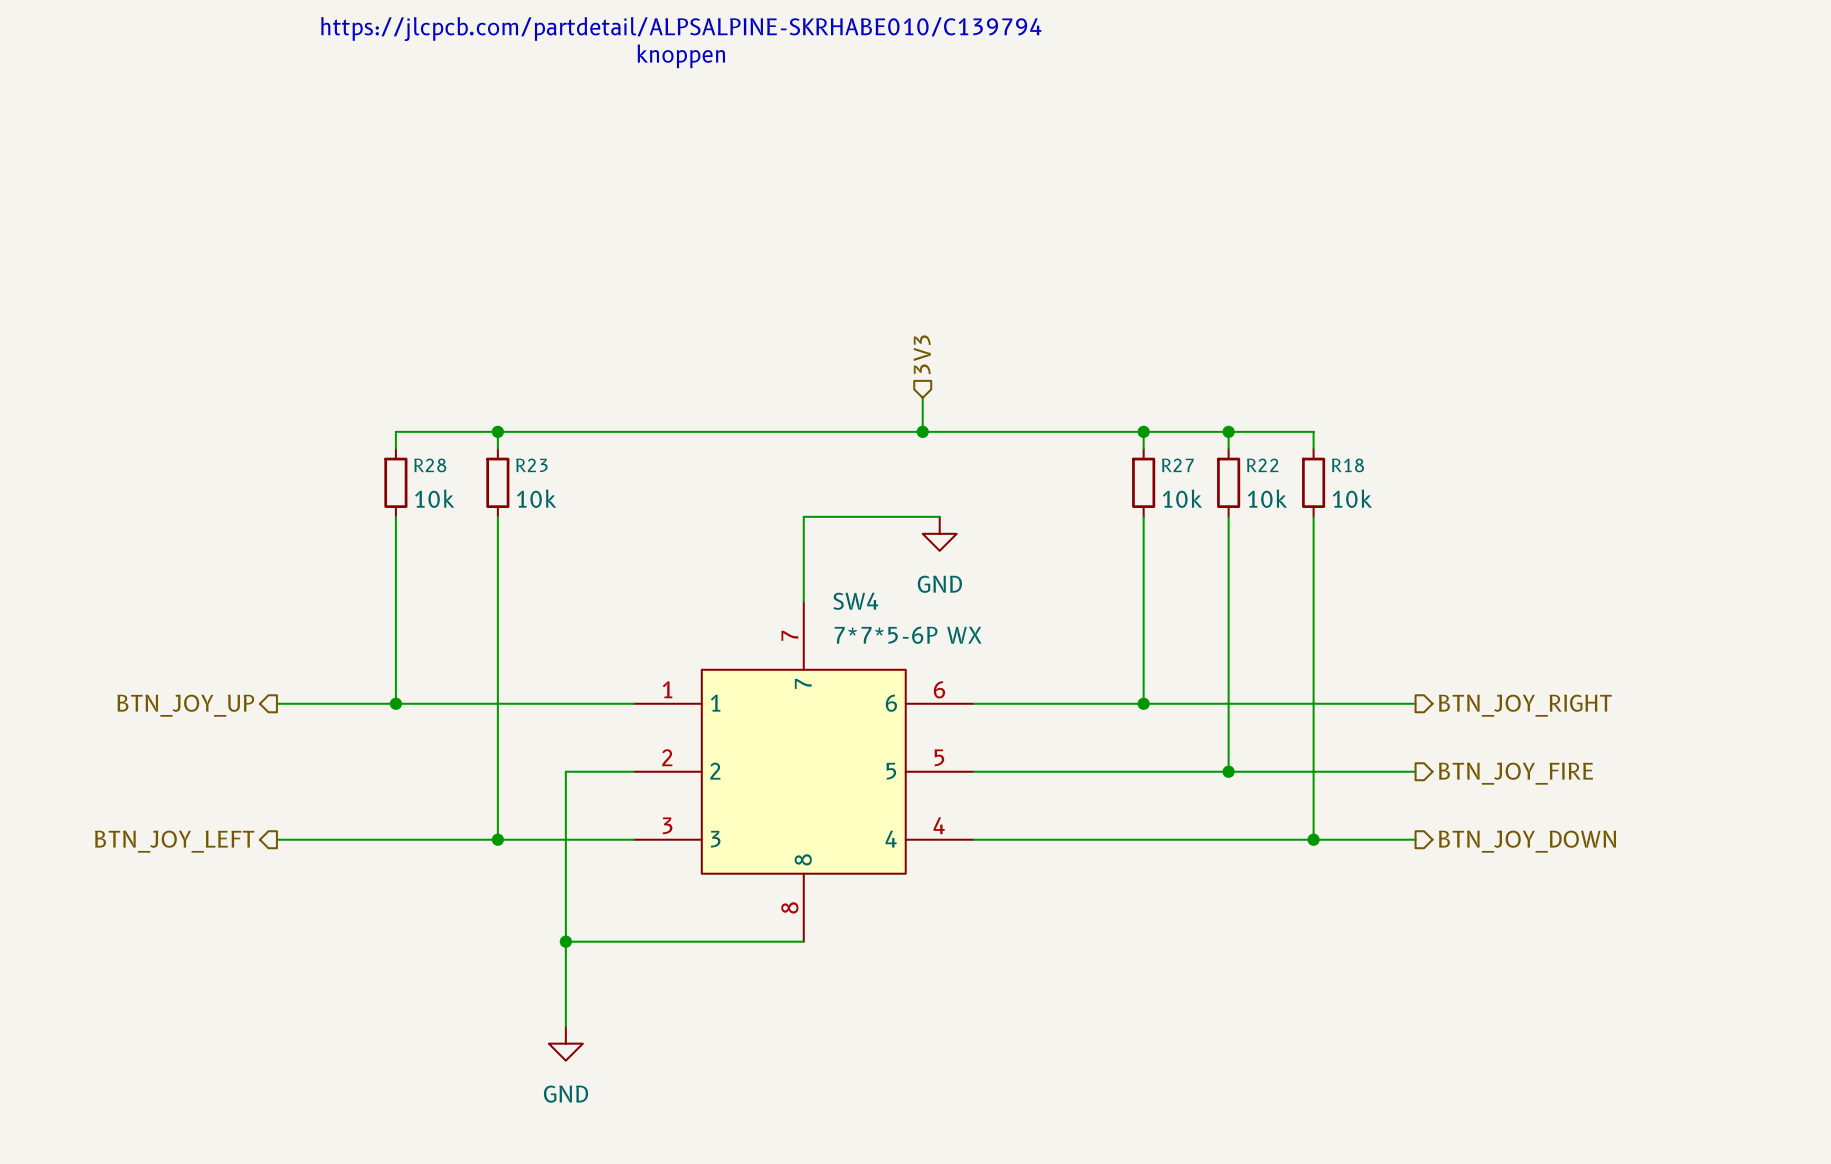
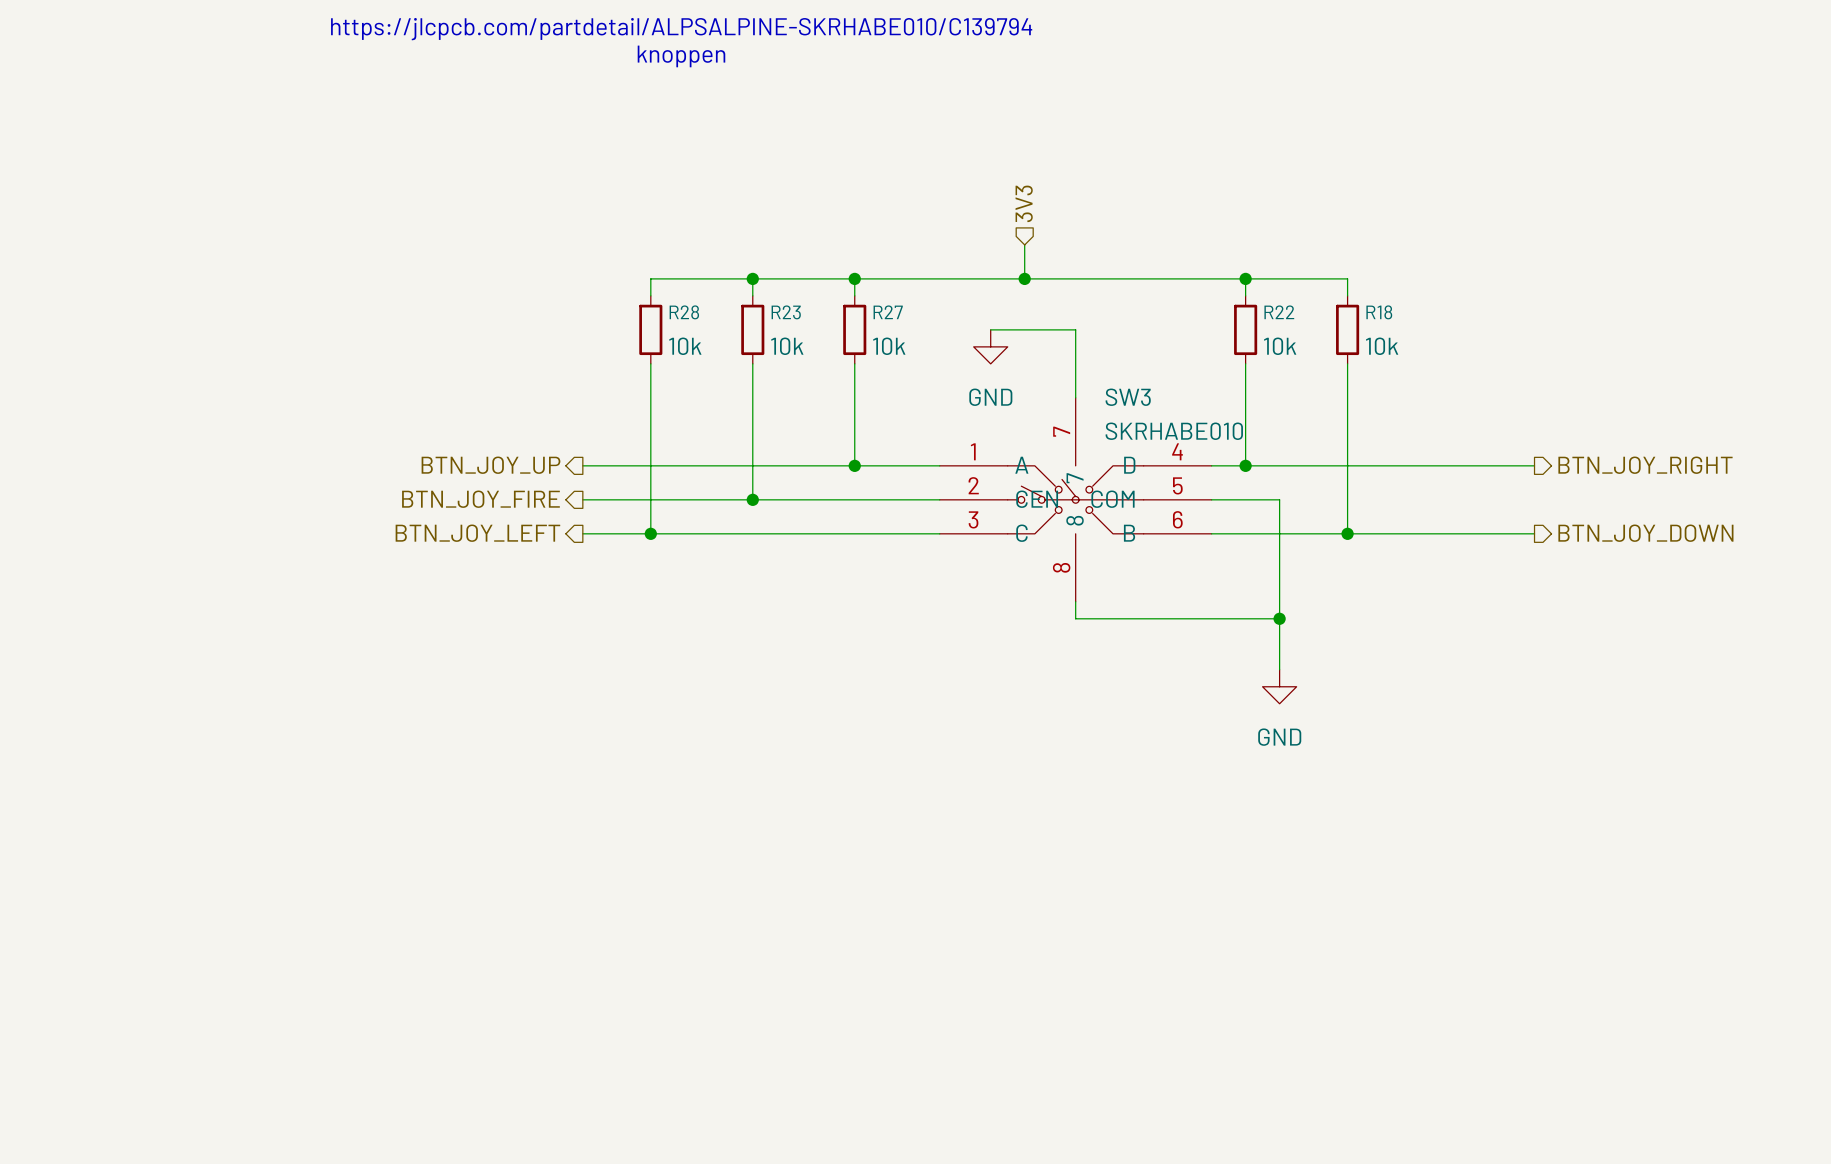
junction: none -> (752, 278)
wire: none -> (854, 278) (854, 295)
junction: none -> (854, 278)
junction: none -> (1024, 278)
junction: none -> (1245, 278)
wire: none -> (650, 295) (650, 278) (1347, 278) (1347, 295)
wire: none -> (990, 329) (1075, 329) (1075, 397)
power symbol: none -> GND (990, 346)
hierarchical label position: 3V3 (922, 354) -> 3V3 (1024, 203)
wire: none -> (650, 363) (650, 533)
wire: none -> (752, 363) (752, 499)
wire: none -> (854, 363) (854, 465)
wire: none -> (1245, 363) (1245, 465)
wire: none -> (1347, 363) (1347, 533)
wire: (922, 397) (922, 431) -> (1024, 244) (1024, 278)
wire: (497, 431) (497, 448) -> (752, 278) (752, 295)
junction: (497, 431) -> none
junction position: (922, 431) -> (854, 465)
wire: (1143, 431) (1143, 448) -> (1245, 278) (1245, 295)
junction: (1143, 431) -> none
wire: (1228, 431) (1228, 448) -> none
junction position: (1228, 431) -> (1245, 465)
wire: (395, 448) (395, 431) (1313, 431) (1313, 448) -> none
wire: none -> (582, 465) (939, 465)
wire: none -> (1211, 465) (1534, 465)
hierarchical label: none -> BTN_JOY_UP (490, 465)
R28 position: (395, 482) -> (650, 329)
R23 position: (497, 482) -> (752, 329)
R27 position: (1143, 482) -> (854, 329)
R22 position: (1228, 482) -> (1245, 329)
R18 position: (1313, 482) -> (1347, 329)
wire: none -> (582, 499) (939, 499)
junction: none -> (752, 499)
SW3: none -> SKRHABE010 (1075, 499)
wire: none -> (1211, 499) (1279, 499) (1279, 669)
hierarchical label: none -> BTN_JOY_FIRE (480, 499)
wire: (395, 516) (395, 703) -> none
wire: (497, 516) (497, 839) -> none
wire: (939, 516) (803, 516) (803, 601) -> none
wire: (1143, 516) (1143, 703) -> none
wire: (1228, 516) (1228, 771) -> none
wire: (1313, 516) (1313, 839) -> none
wire: none -> (582, 533) (939, 533)
junction: none -> (650, 533)
power symbol: GND (939, 533) -> none
wire: none -> (1211, 533) (1534, 533)
junction: none -> (1347, 533)
hierarchical label: none -> BTN_JOY_LEFT (477, 533)
wire: none -> (1075, 601) (1075, 618) (1279, 618)
junction: none -> (1279, 618)
power symbol: none -> GND (1279, 686)
wire: (276, 703) (633, 703) -> none
junction: (395, 703) -> none
wire: (973, 703) (1415, 703) -> none
junction: (1143, 703) -> none
hierarchical label: BTN_JOY_UP (185, 705) -> none
hierarchical label position: BTN_JOY_RIGHT (1525, 705) -> BTN_JOY_RIGHT (1645, 465)
wire: (633, 771) (565, 771) (565, 1026) -> none
SW4: 7*7*5-6P WX (803, 771) -> none
wire: (973, 771) (1415, 771) -> none
junction: (1228, 771) -> none
hierarchical label: BTN_JOY_FIRE (1515, 773) -> none
wire: (276, 839) (633, 839) -> none
junction: (497, 839) -> none
wire: (973, 839) (1415, 839) -> none
junction: (1313, 839) -> none
hierarchical label: BTN_JOY_LEFT (174, 841) -> none
hierarchical label position: BTN_JOY_DOWN (1527, 841) -> BTN_JOY_DOWN (1645, 533)
wire: (565, 941) (803, 941) -> none
junction: (565, 941) -> none
power symbol: GND (565, 1043) -> none

